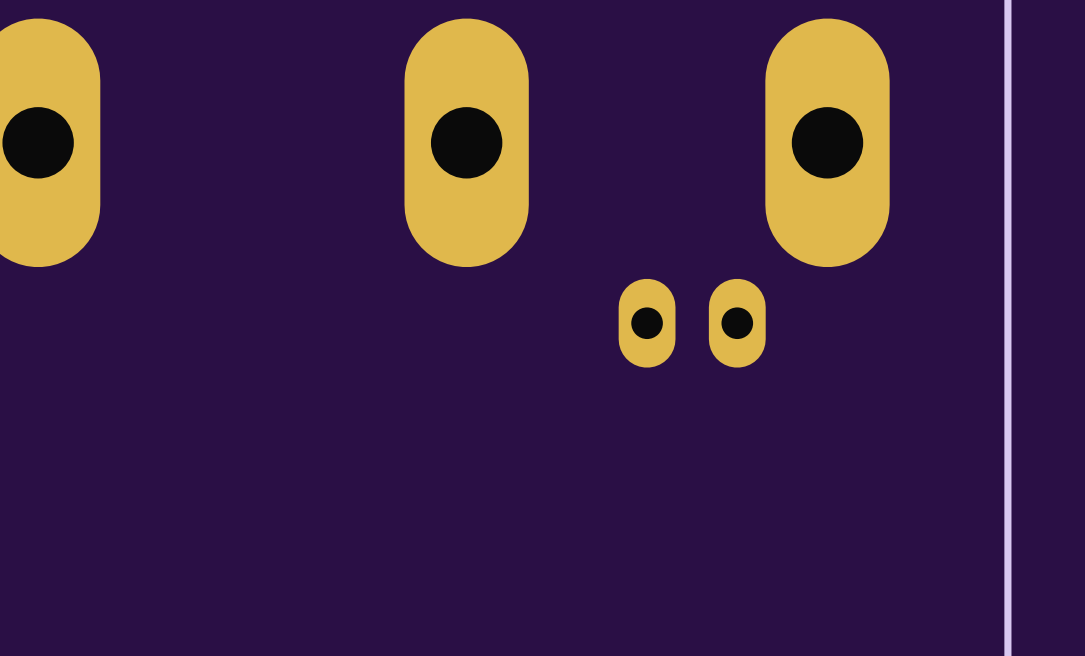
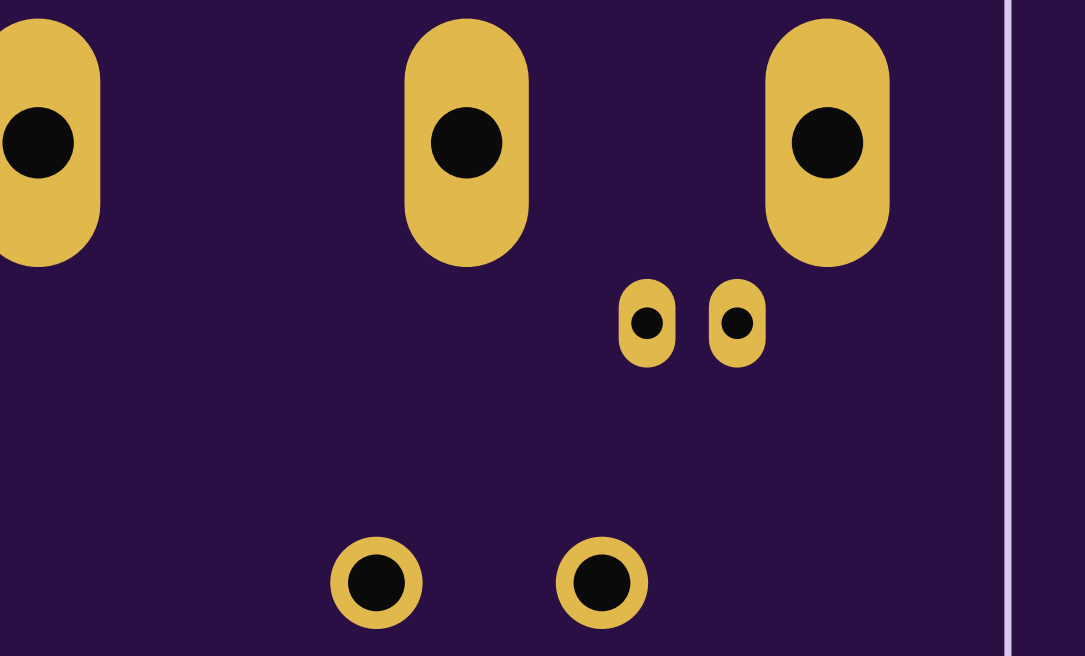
part: none -> (376, 582)
part: none -> (601, 582)

